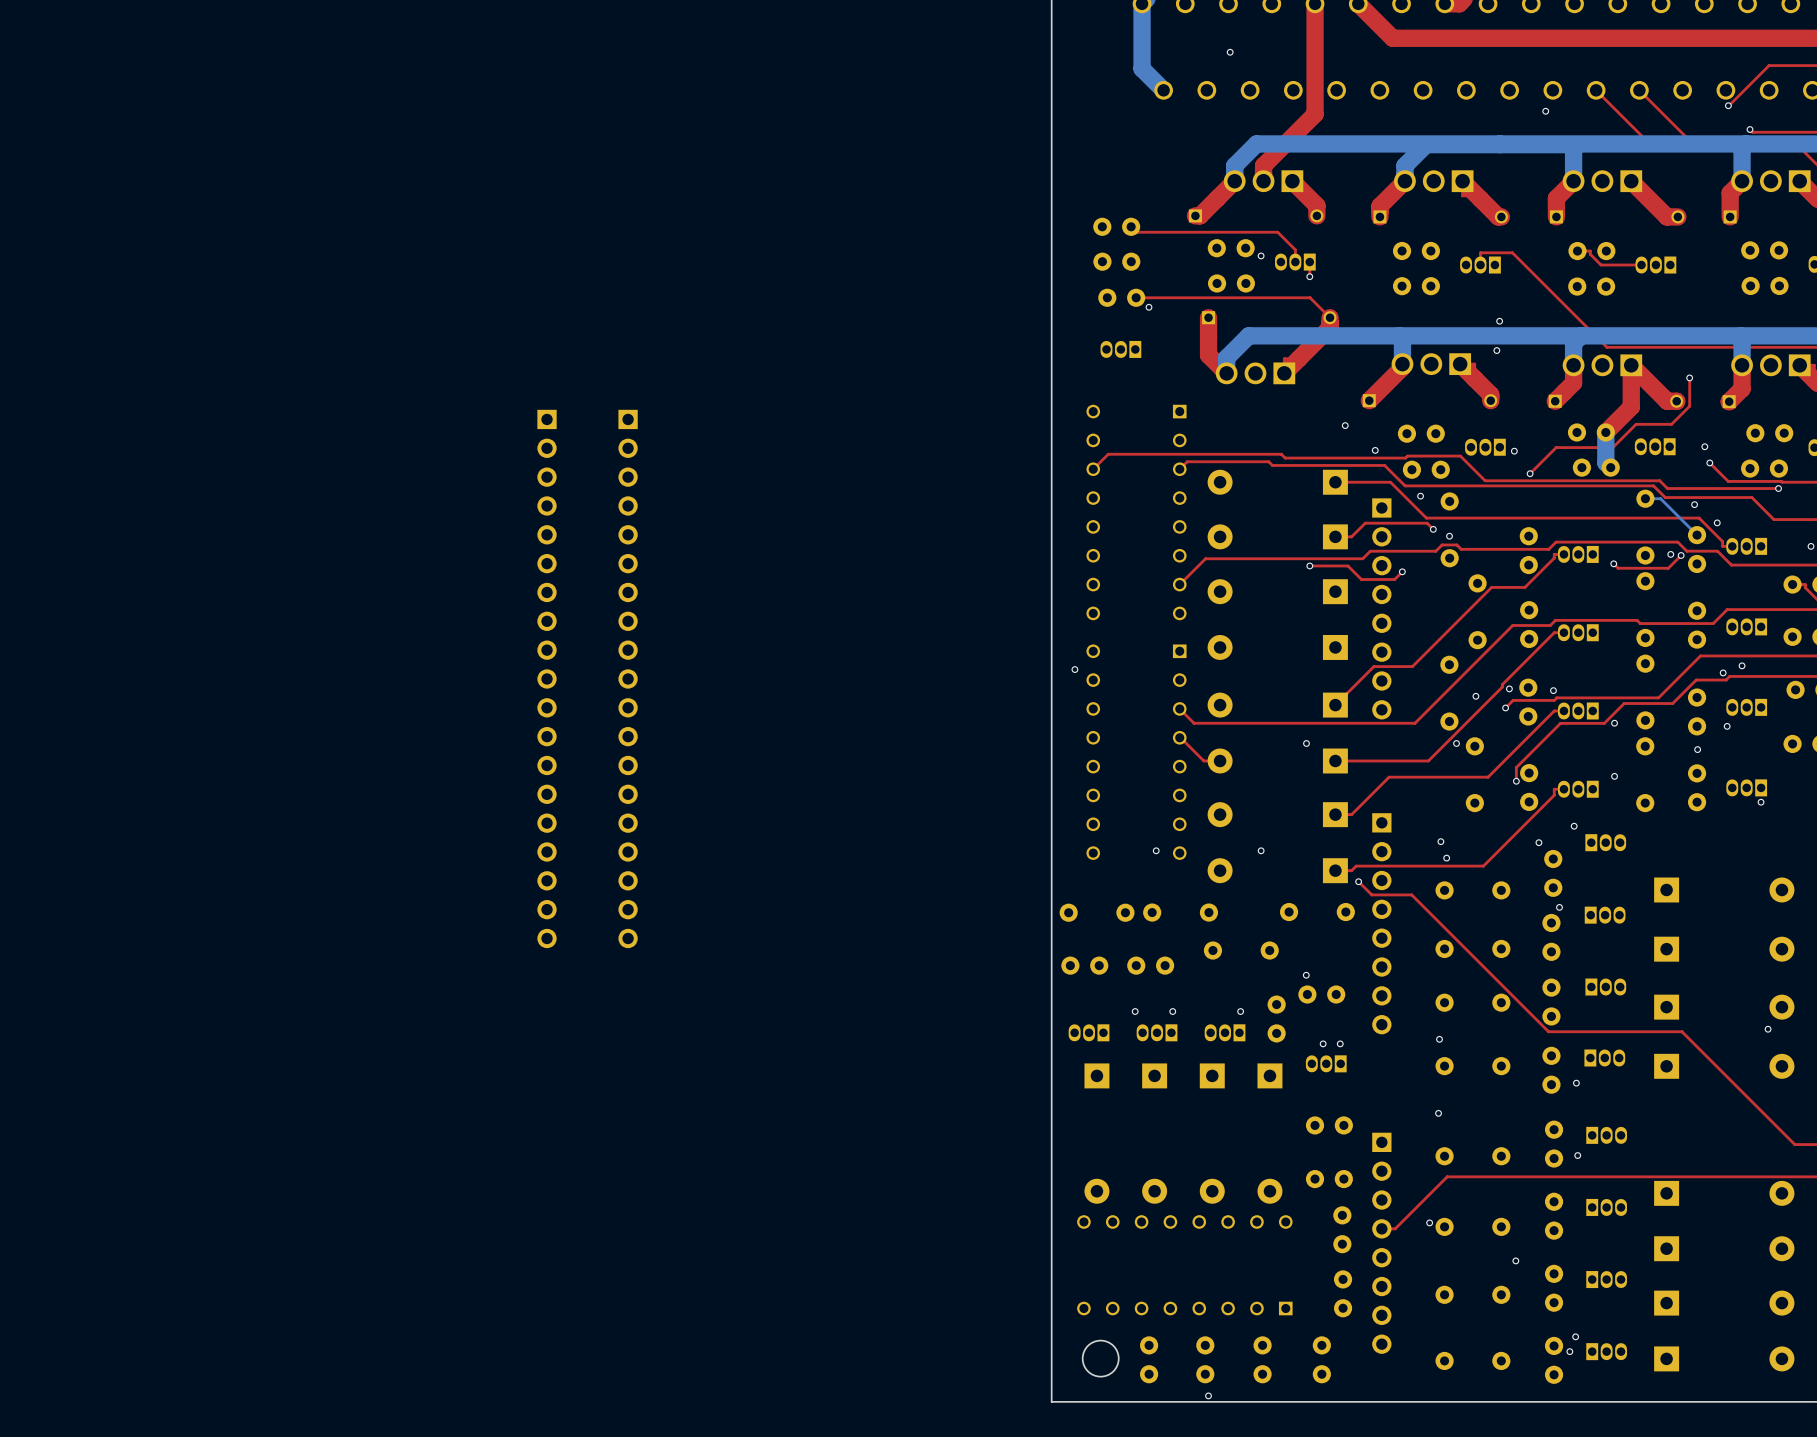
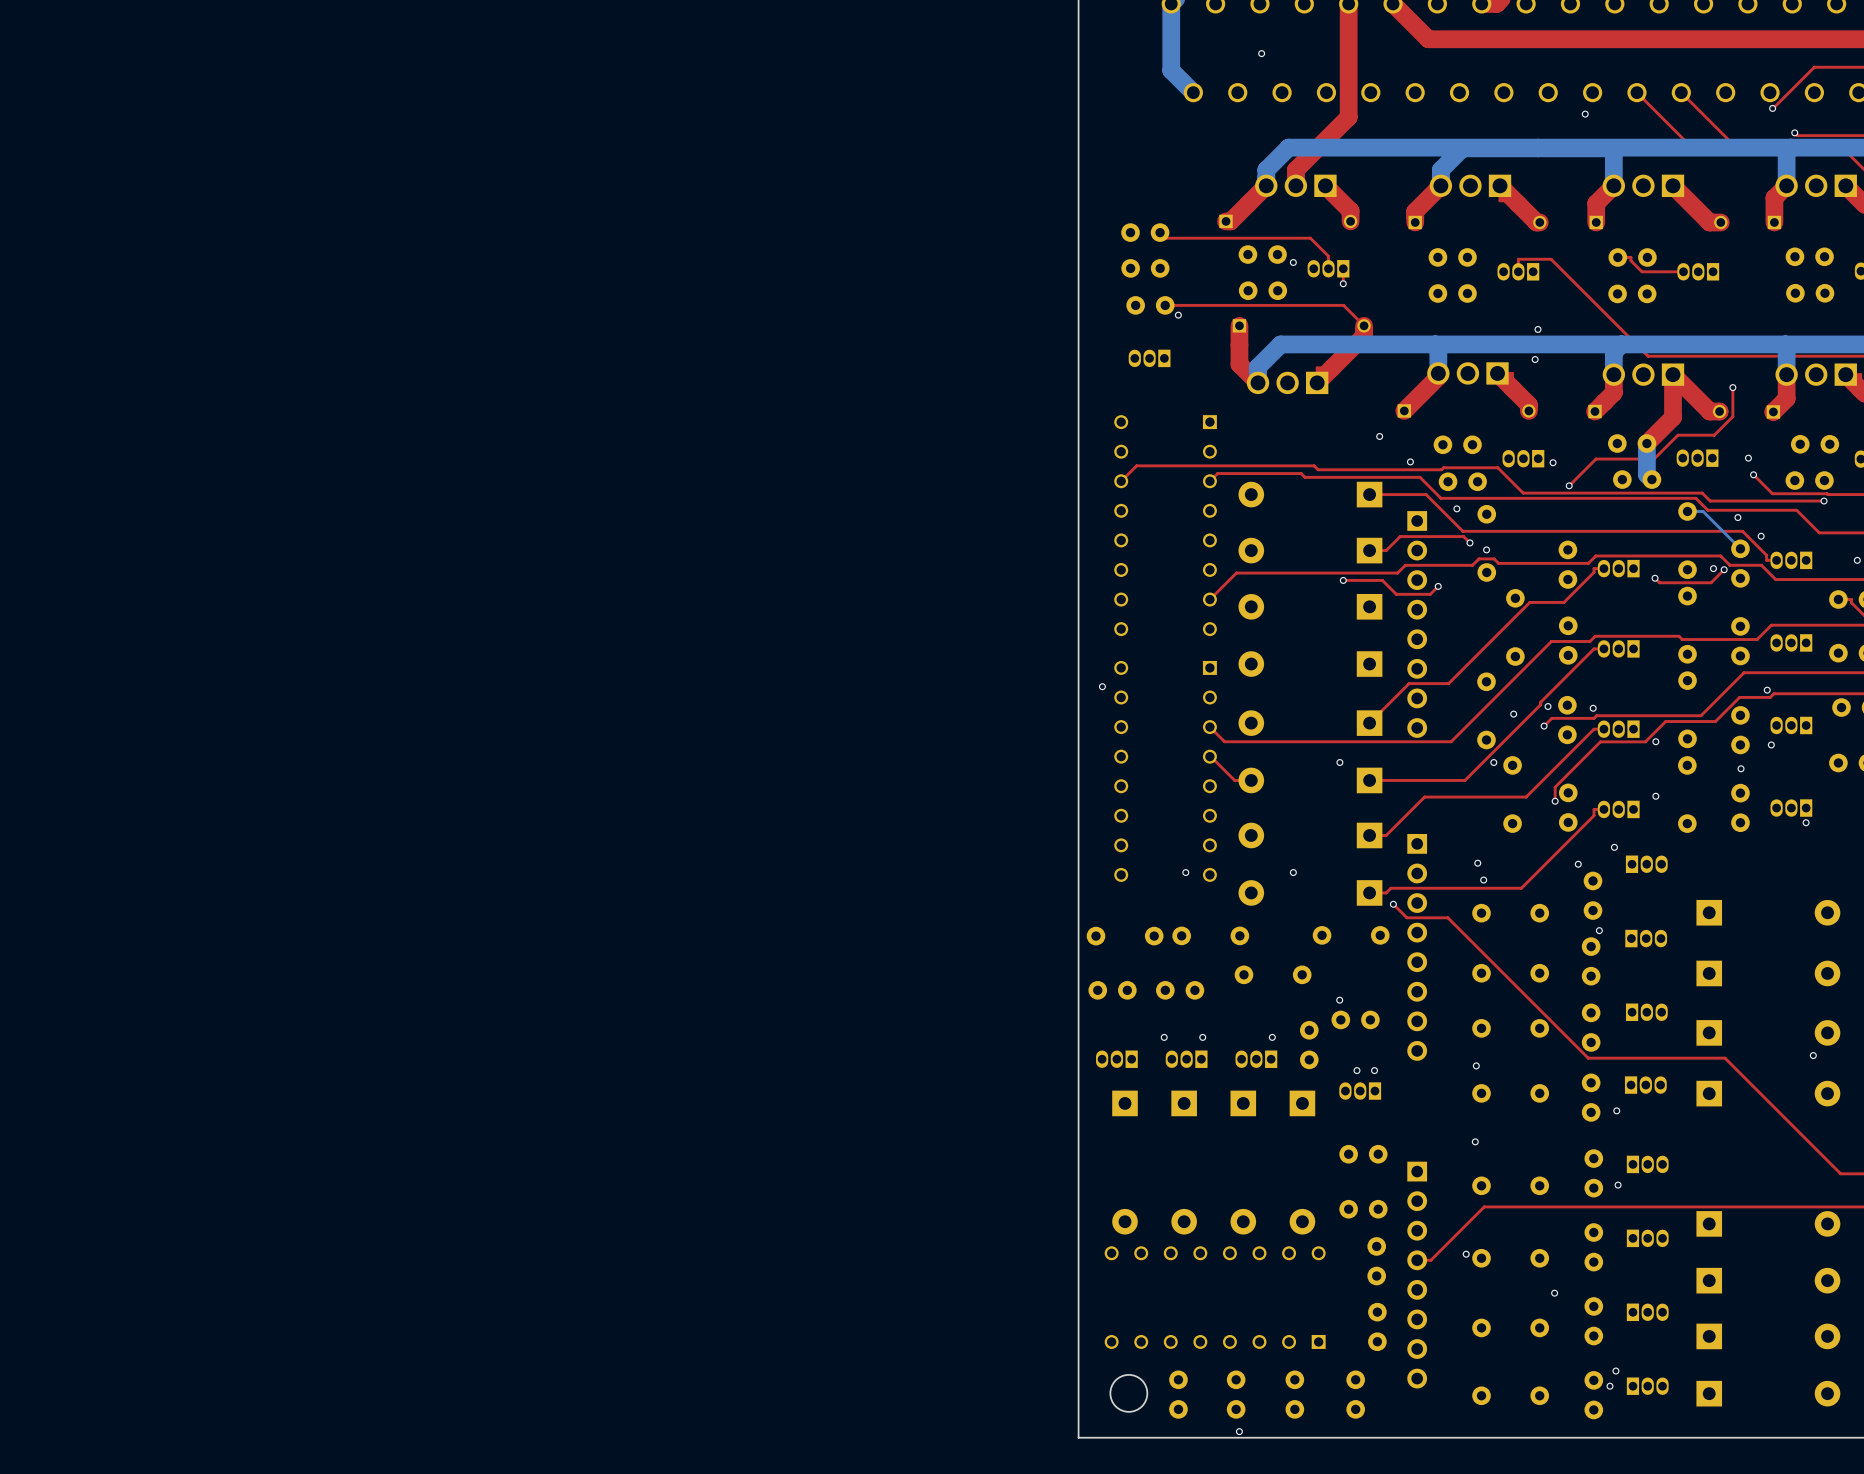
via: (1742, 665) -> none
part: (547, 678) -> none
part: (628, 678) -> none

